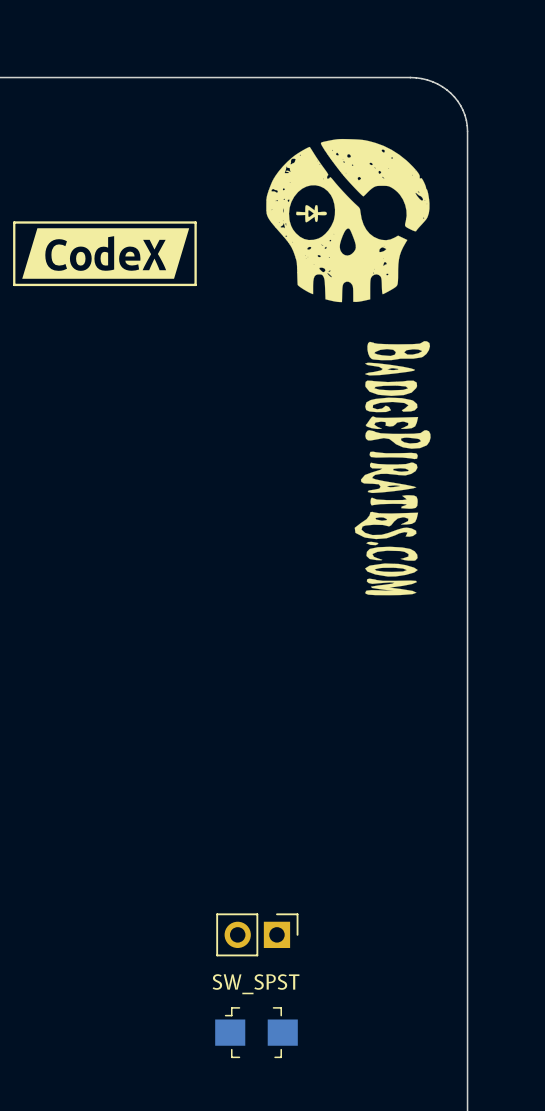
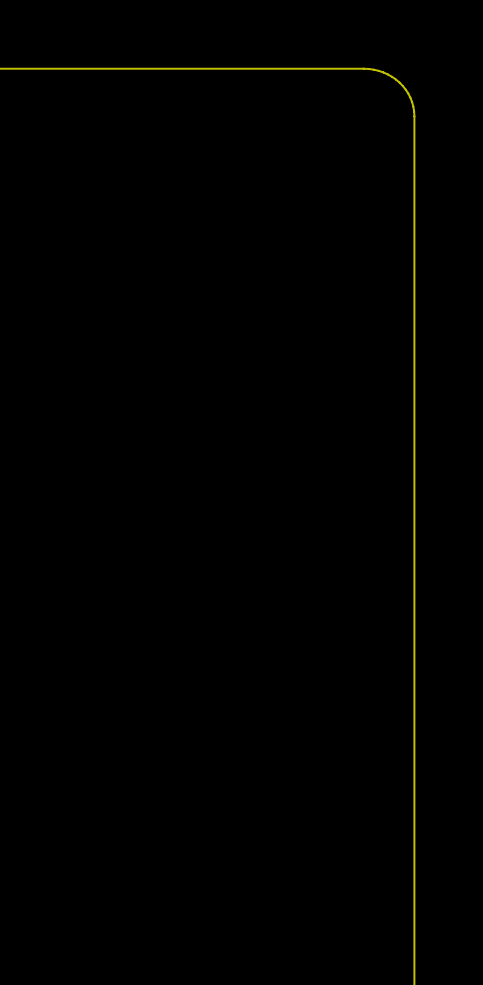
drawing: [266, 138, 430, 303] -> none
line: (195, 222) (195, 284) (14, 284) (14, 222) (195, 222) -> none
drawing: [22, 228, 190, 279] -> none
drawing: [354, 341, 431, 596] -> none
part: (257, 934) -> none
part: SW_SPST (256, 1032) -> none

